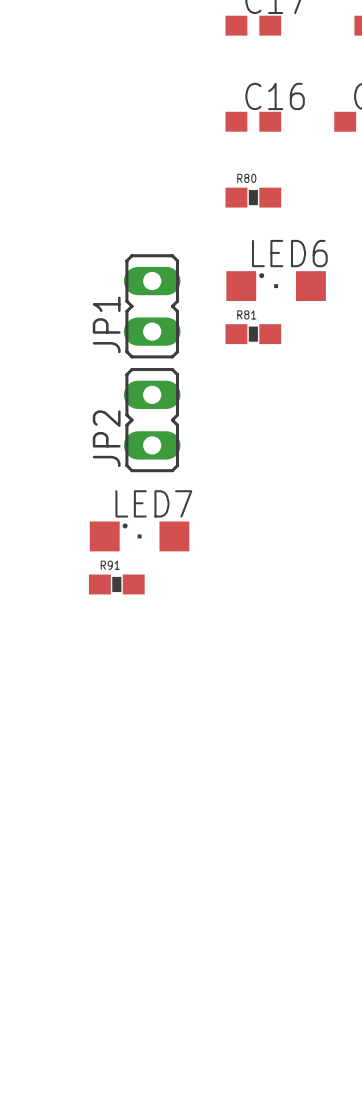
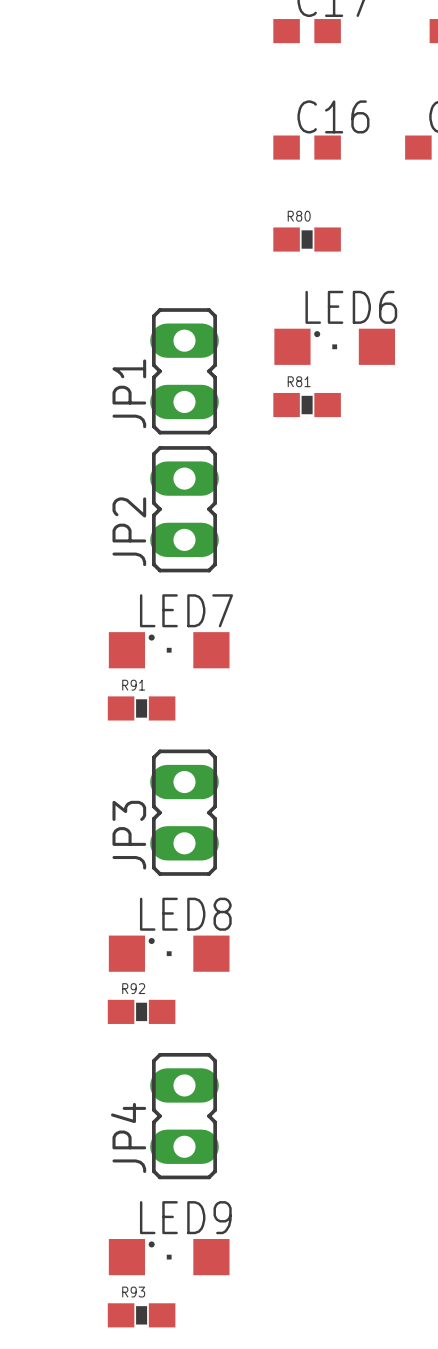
JP3: none -> (184, 812)
LED8: none -> (169, 953)
R92: none -> (141, 1011)
JP4: none -> (184, 1116)
LED9: none -> (169, 1257)
R93: none -> (141, 1315)

